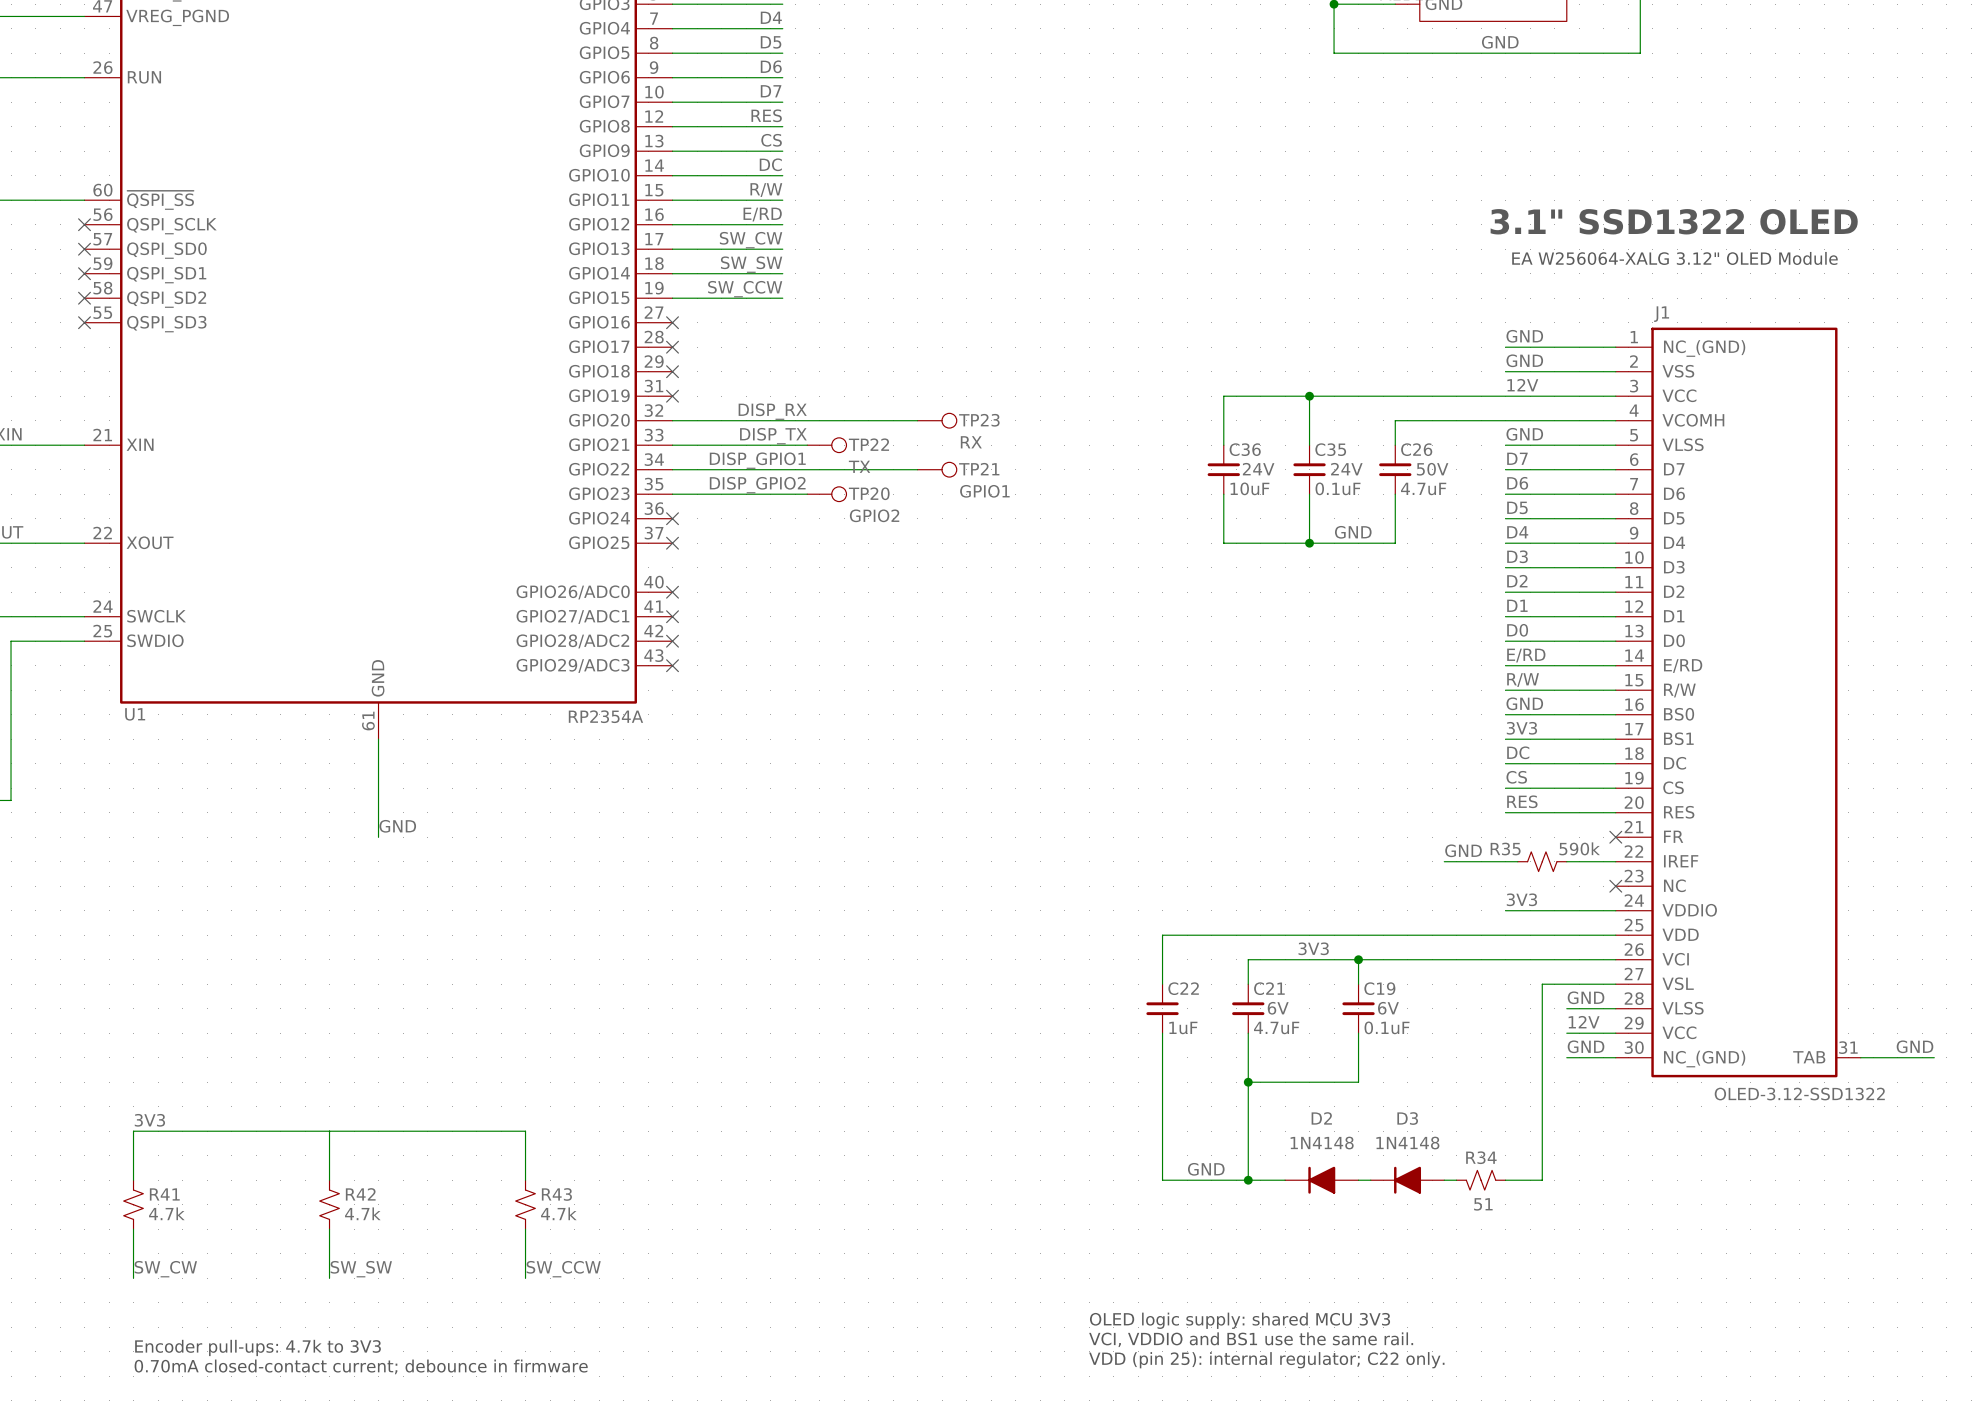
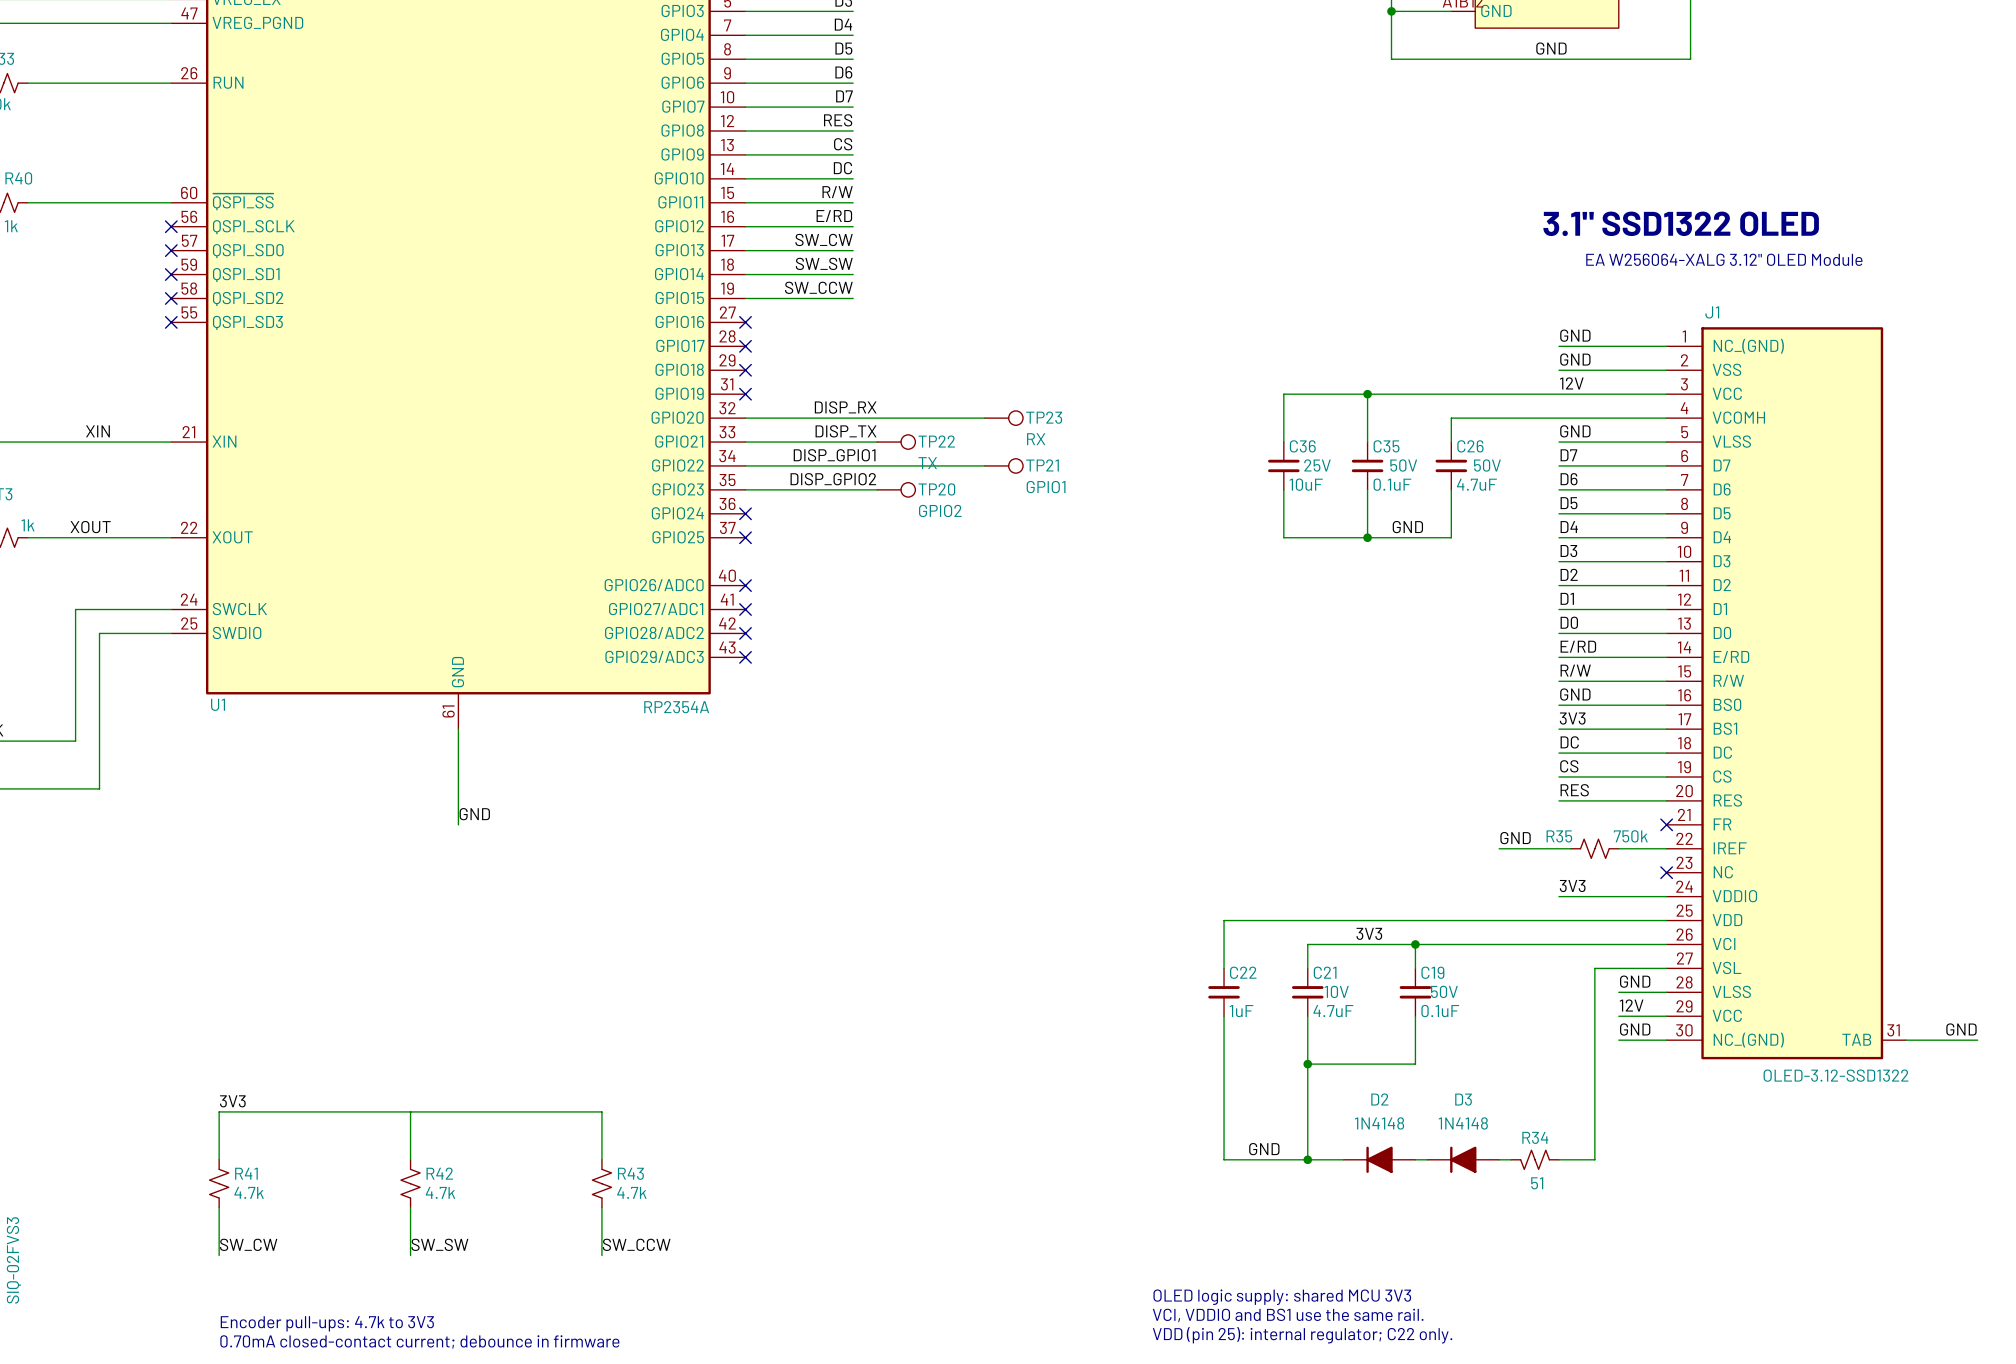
C36 text: 24V (1258, 469) -> 25V (1317, 465)
C35 text: 24V (1346, 469) -> 50V (1403, 465)
R35 value: 590k (1579, 848) -> 750k (1630, 836)
C21 text: 6V (1278, 1008) -> 10V (1336, 991)
C19 text: 6V (1388, 1008) -> 50V (1444, 991)

